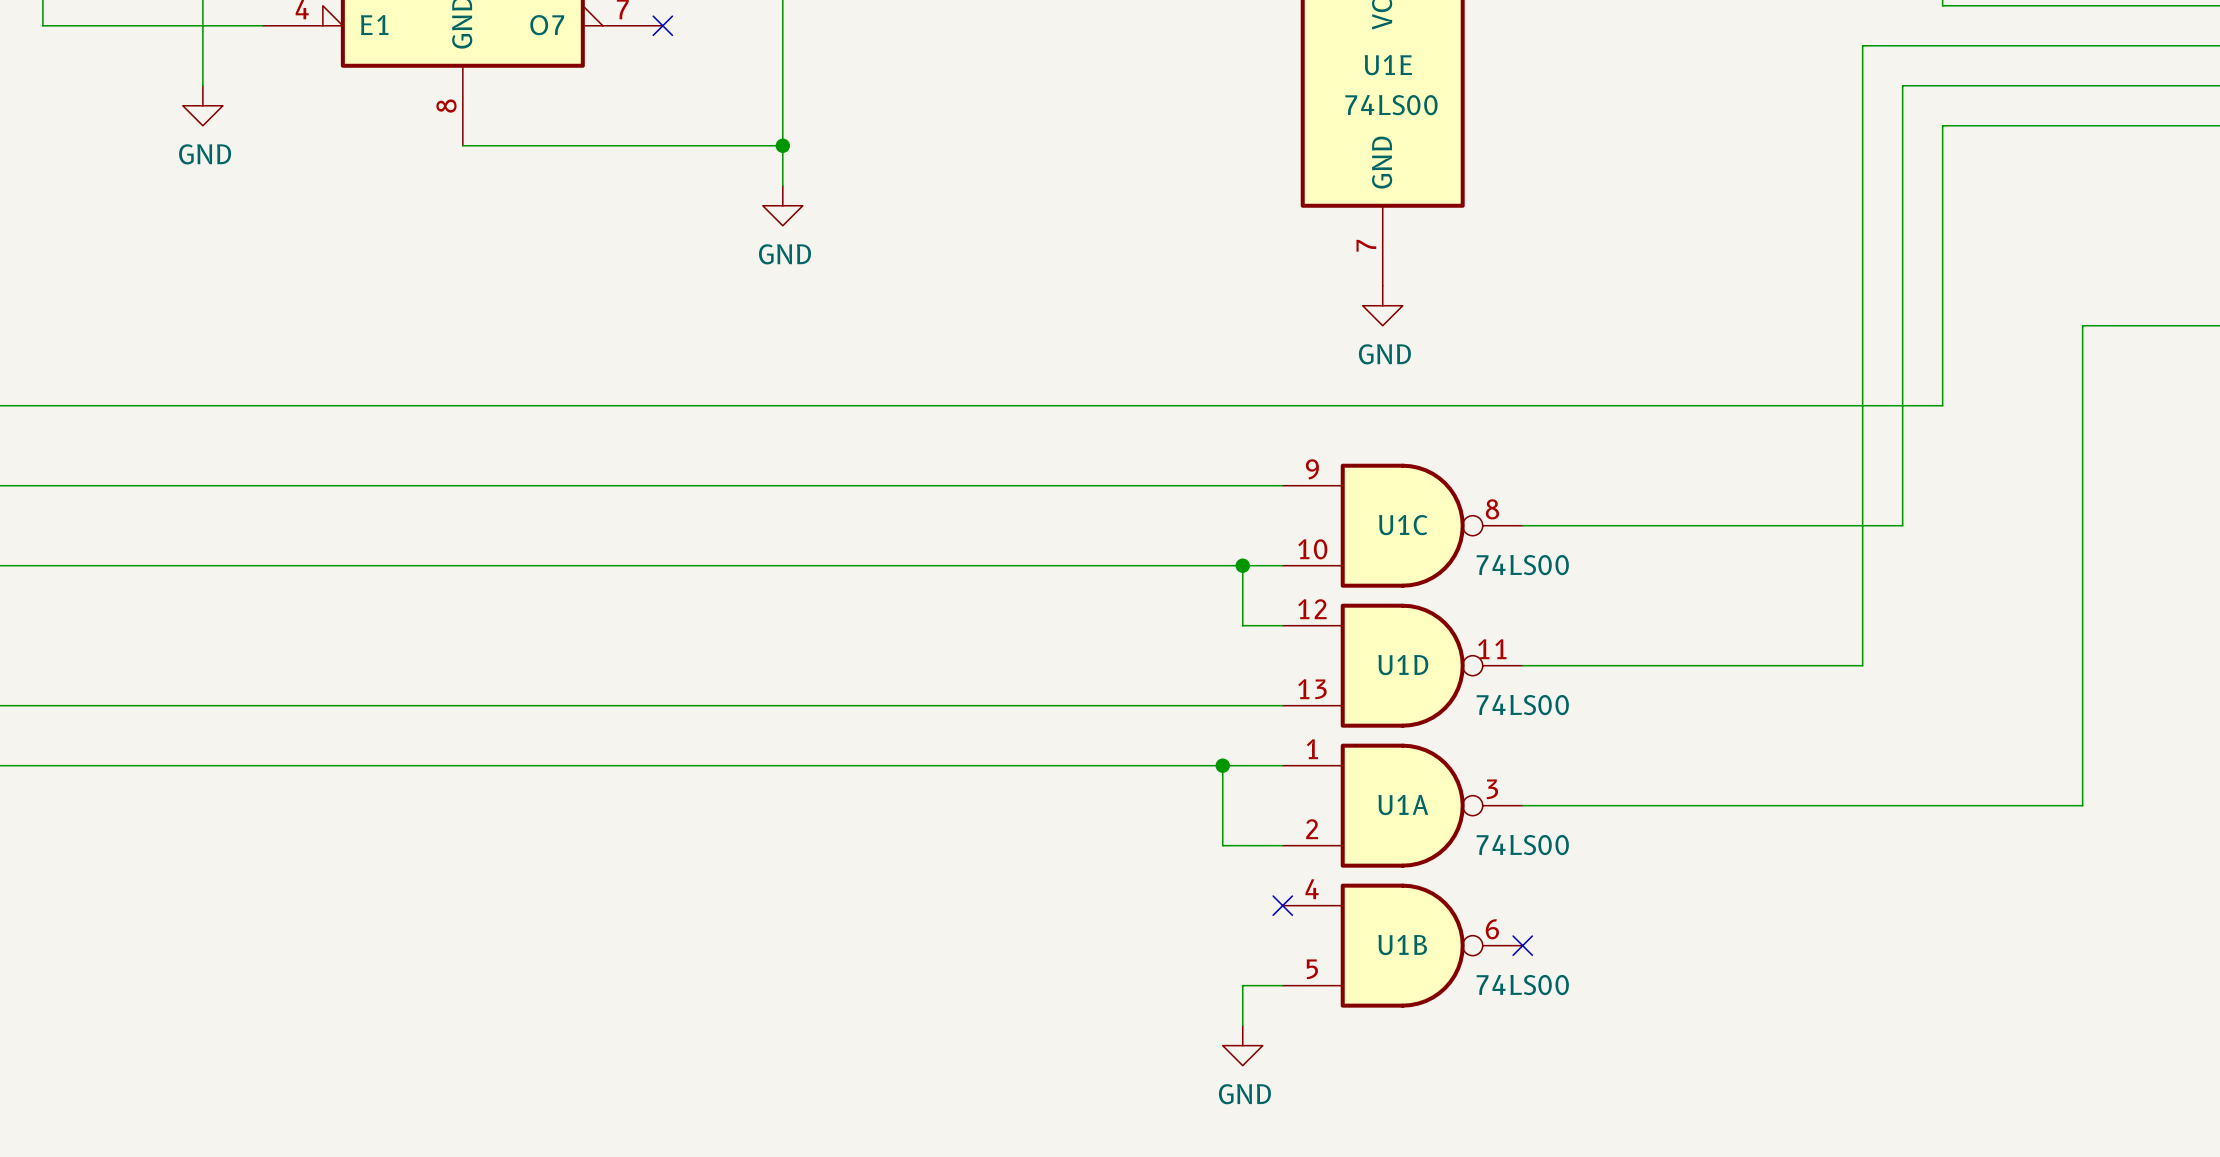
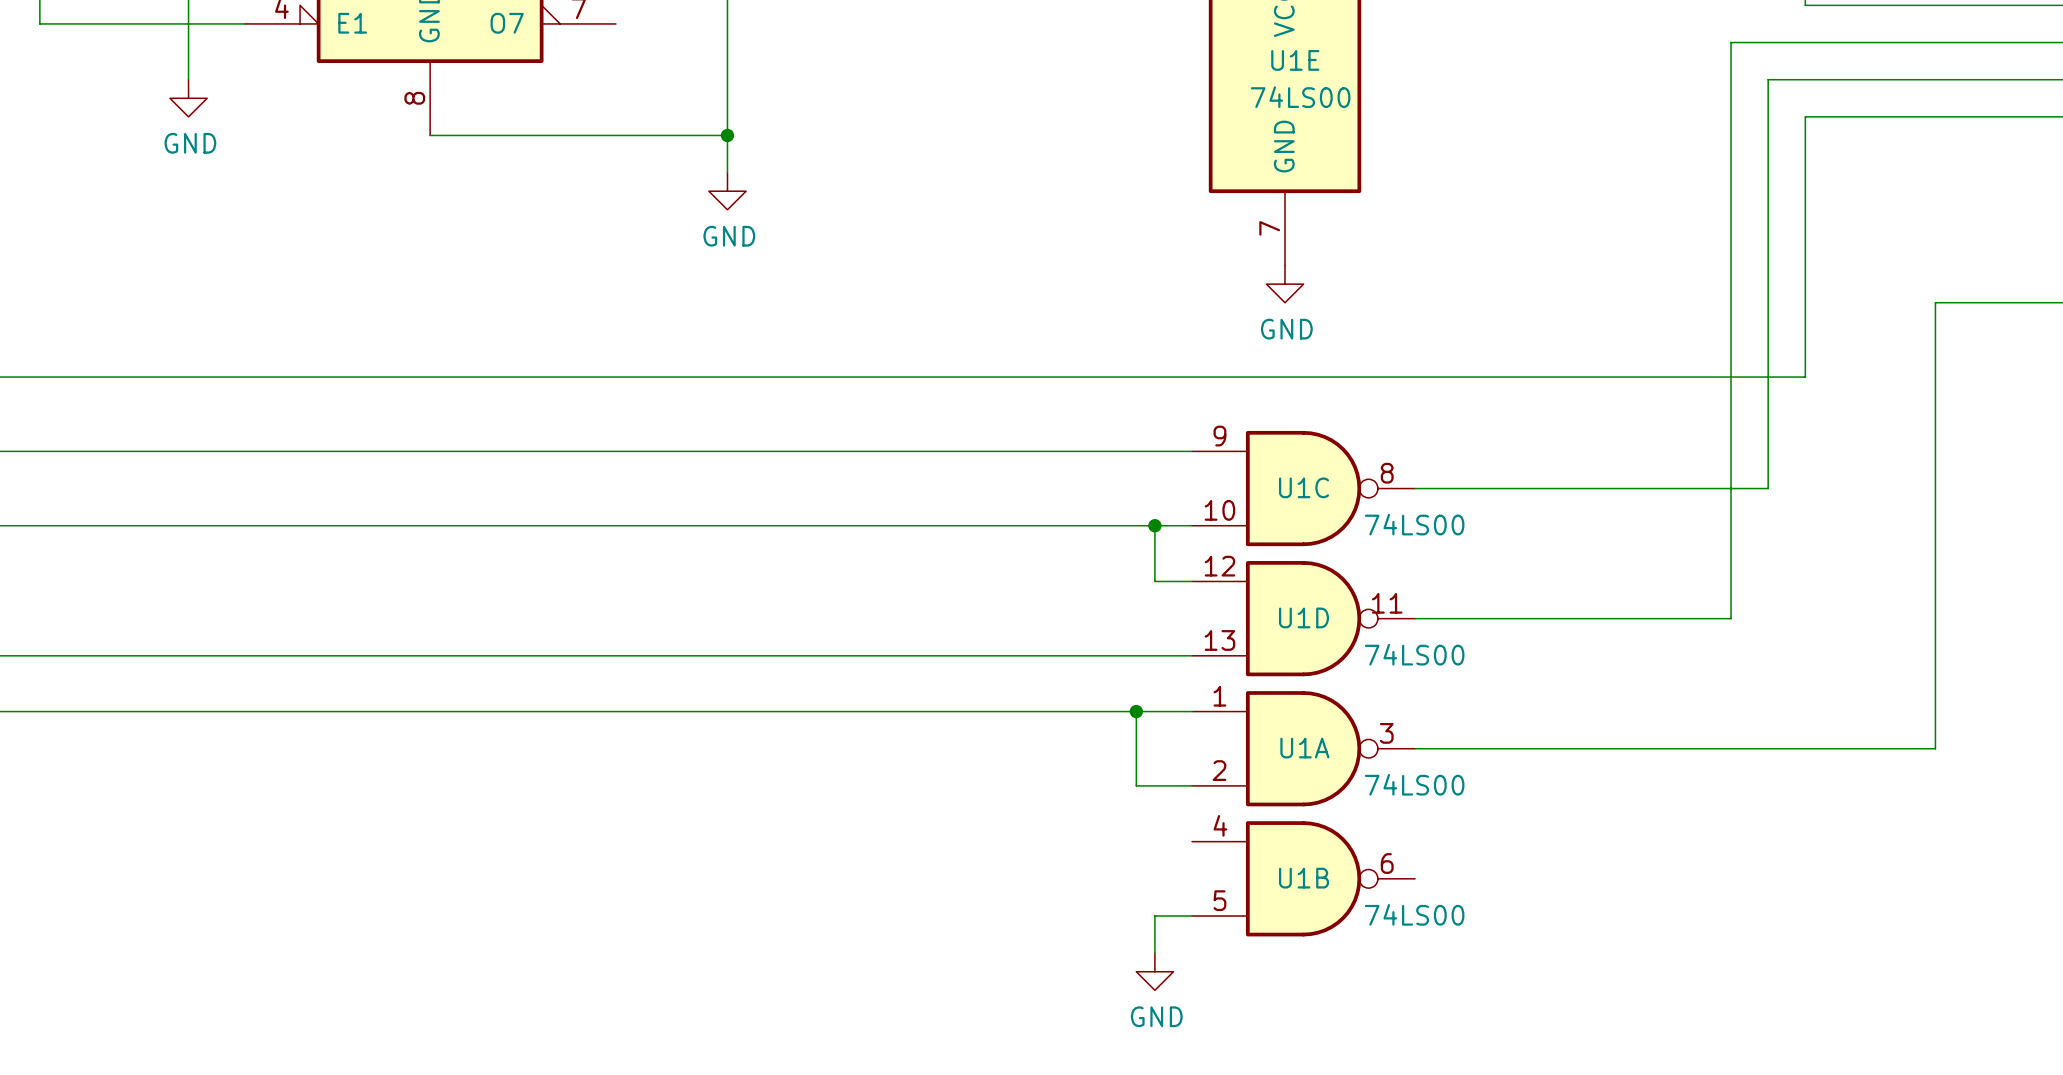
no-connect mark: (662, 25) -> none
no-connect mark: (1282, 905) -> none
no-connect mark: (1522, 945) -> none

